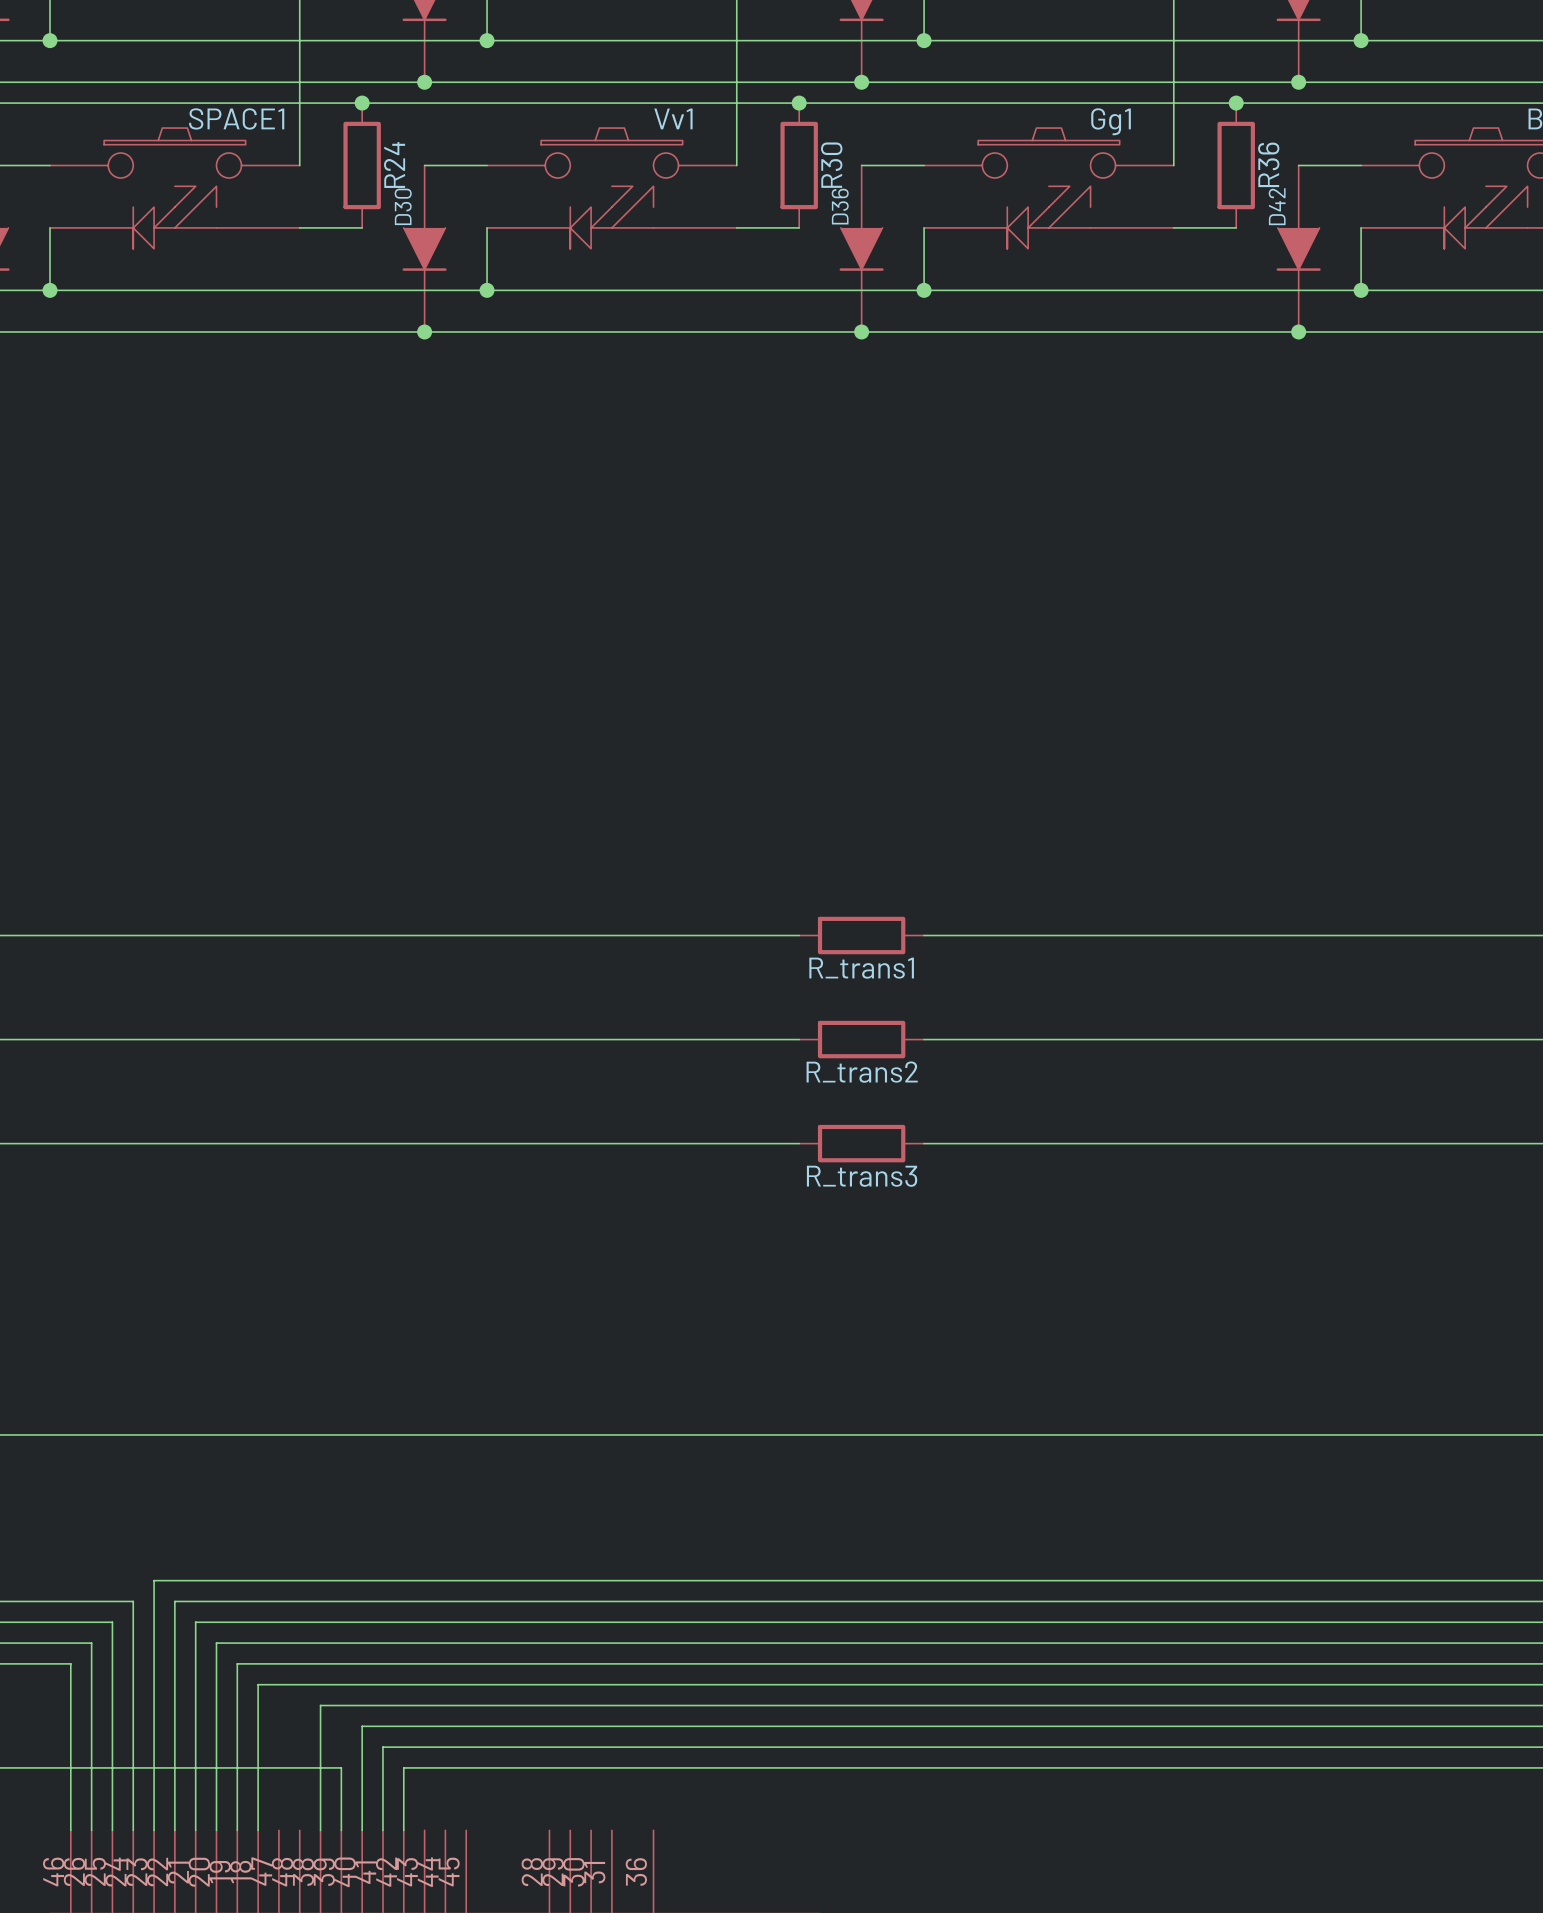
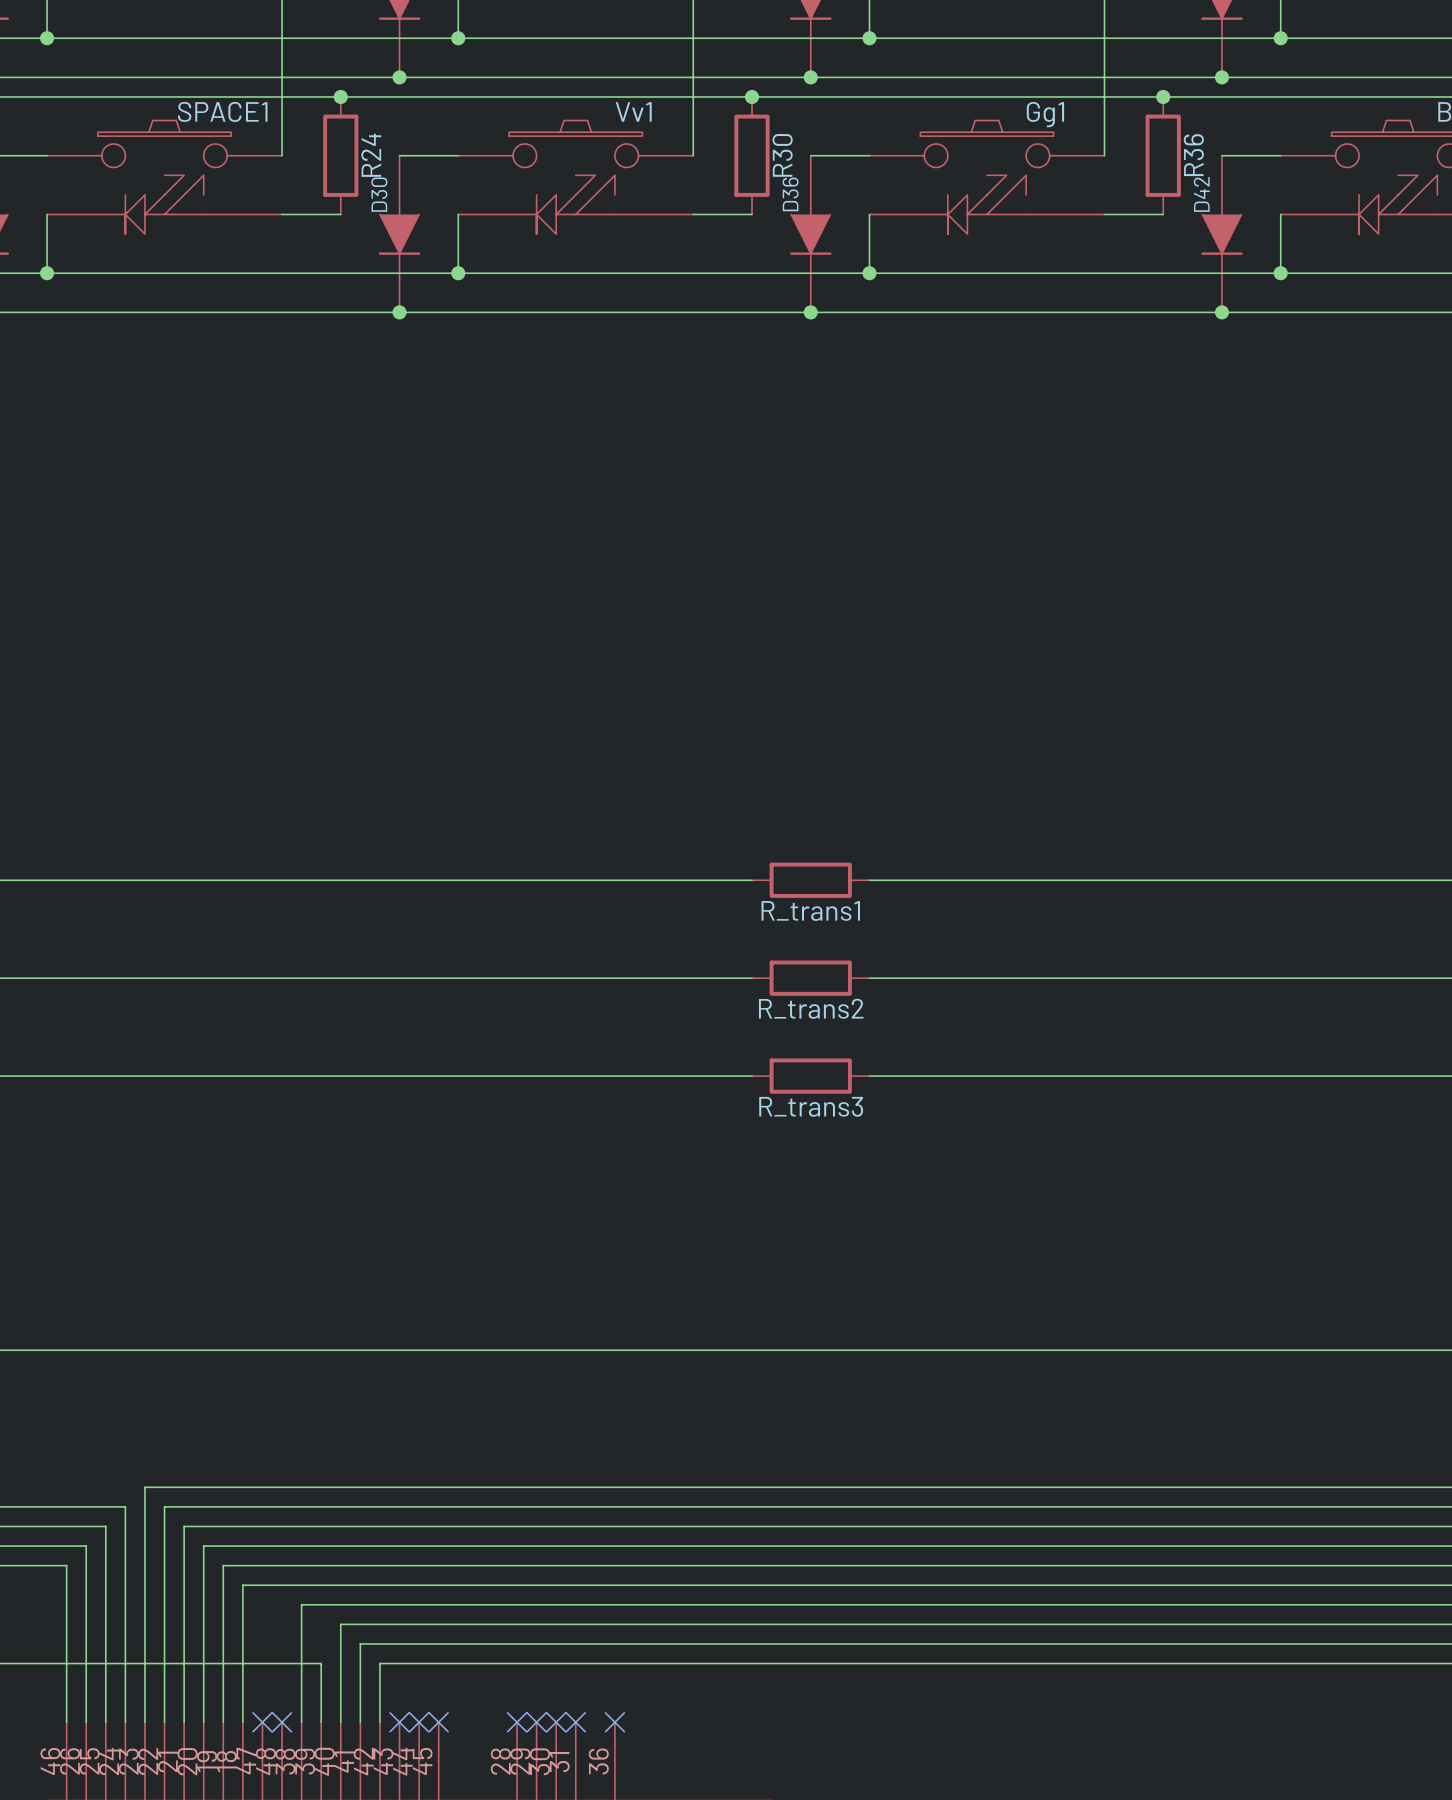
no-connect mark: none -> (262, 1722)
no-connect mark: none -> (282, 1722)
no-connect mark: none -> (399, 1722)
no-connect mark: none -> (419, 1722)
no-connect mark: none -> (438, 1722)
no-connect mark: none -> (517, 1722)
no-connect mark: none -> (536, 1722)
no-connect mark: none -> (556, 1722)
no-connect mark: none -> (575, 1722)
no-connect mark: none -> (614, 1722)

